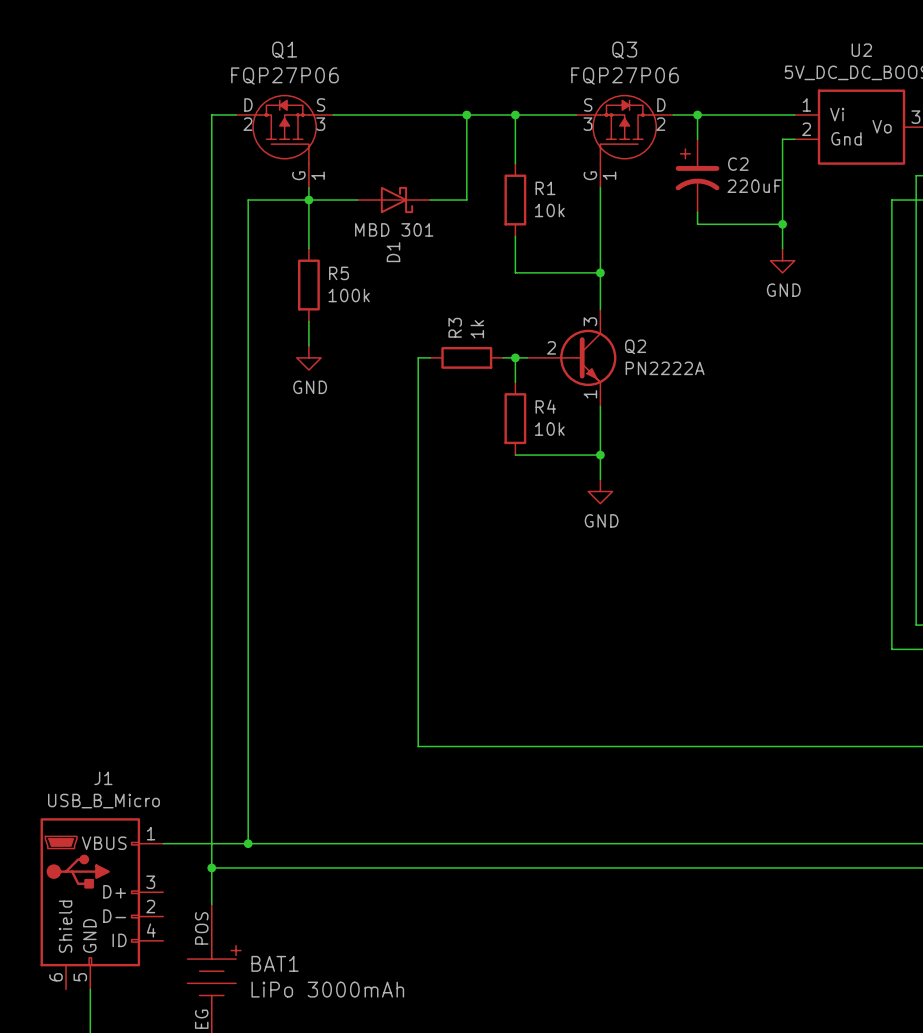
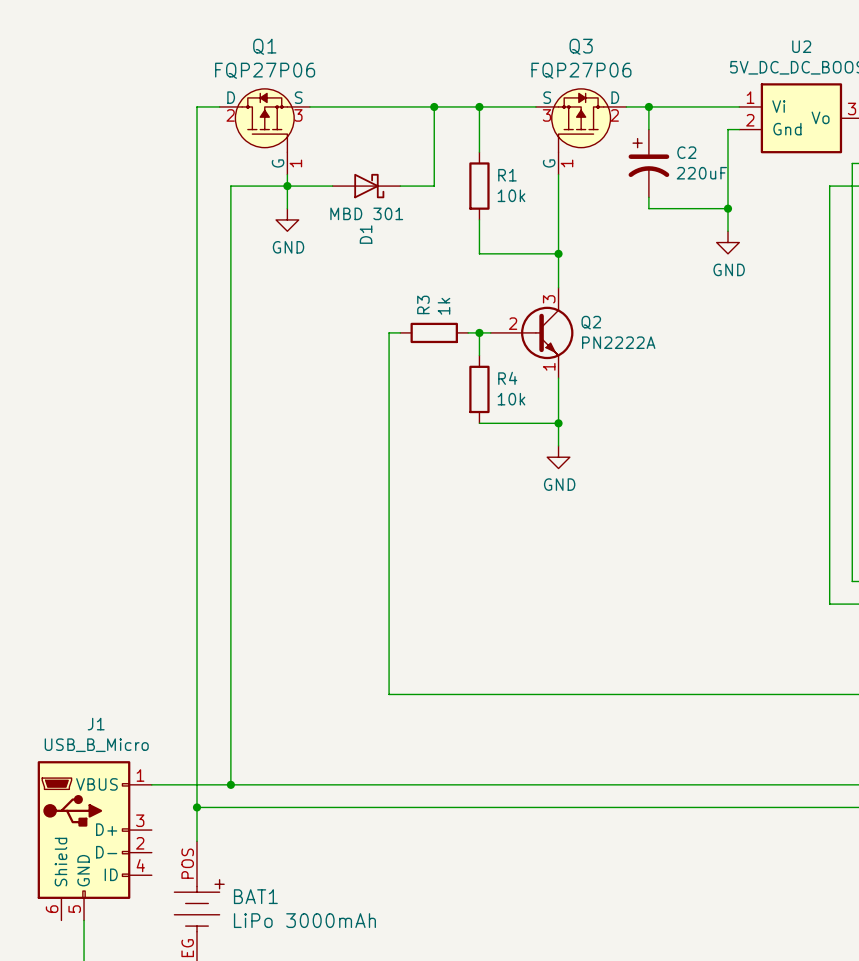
R5: 100k (308, 285) -> none
wire: (308, 321) (308, 345) -> none
power symbol position: GND (308, 357) -> GND (287, 219)

